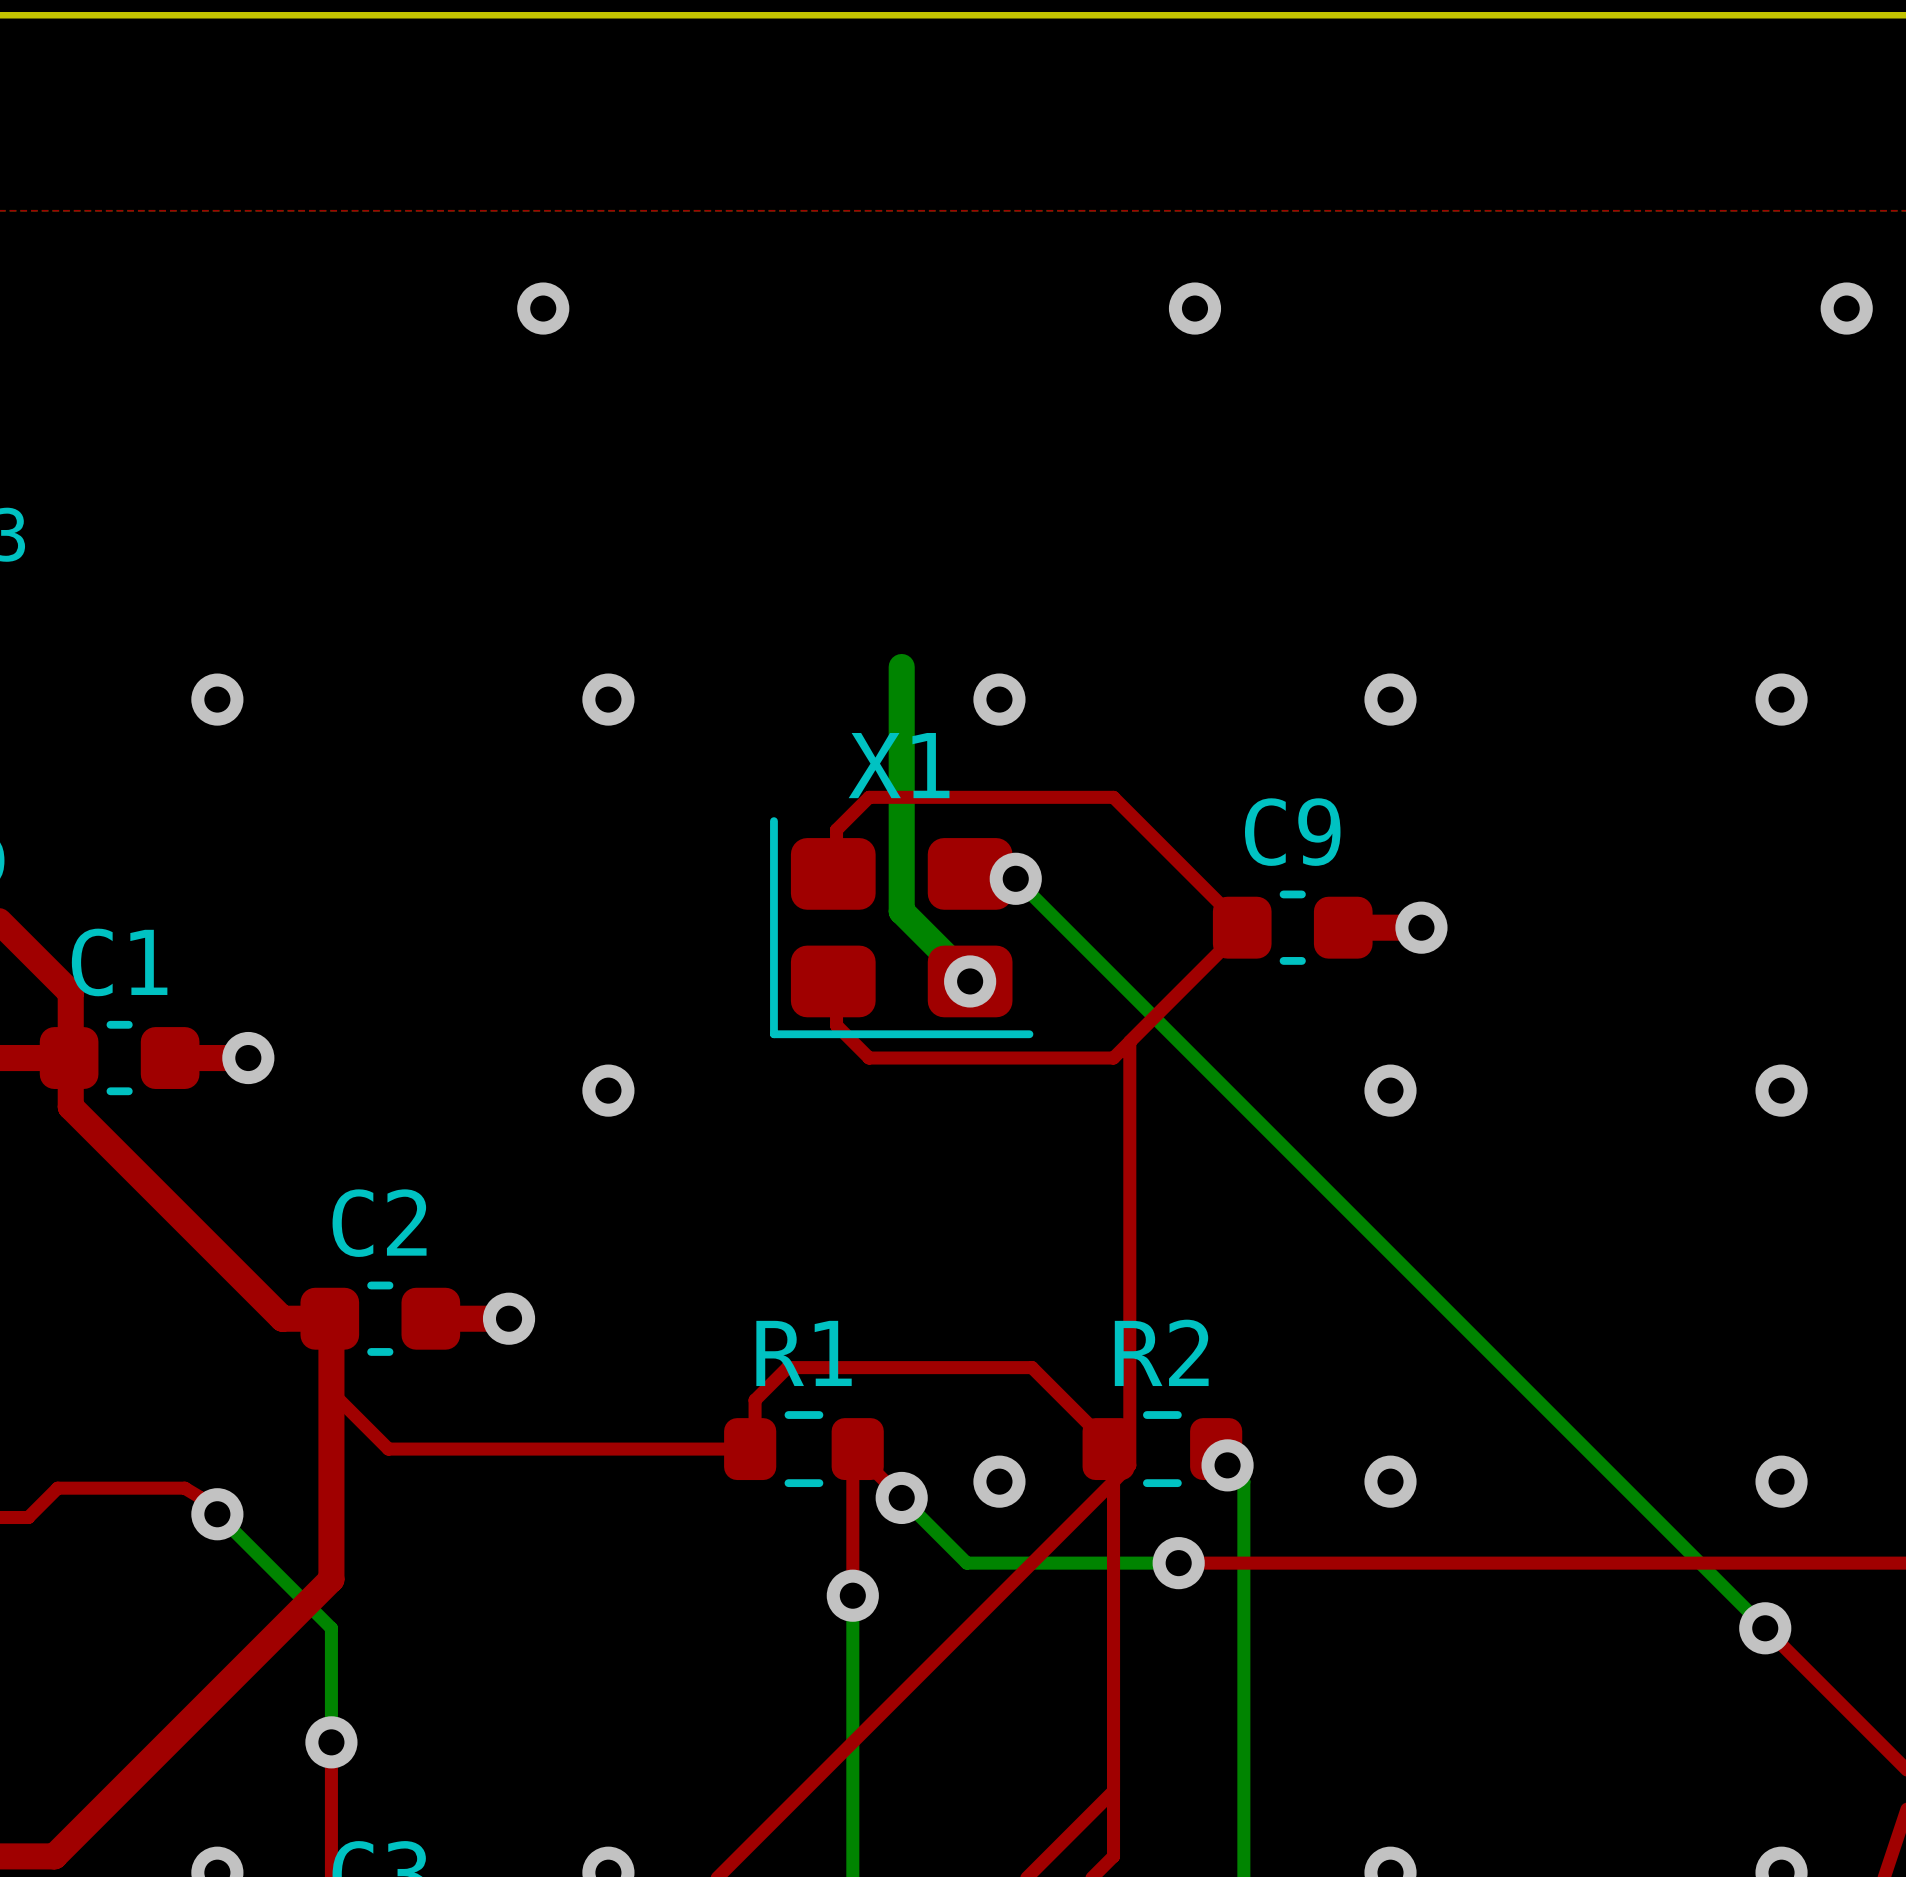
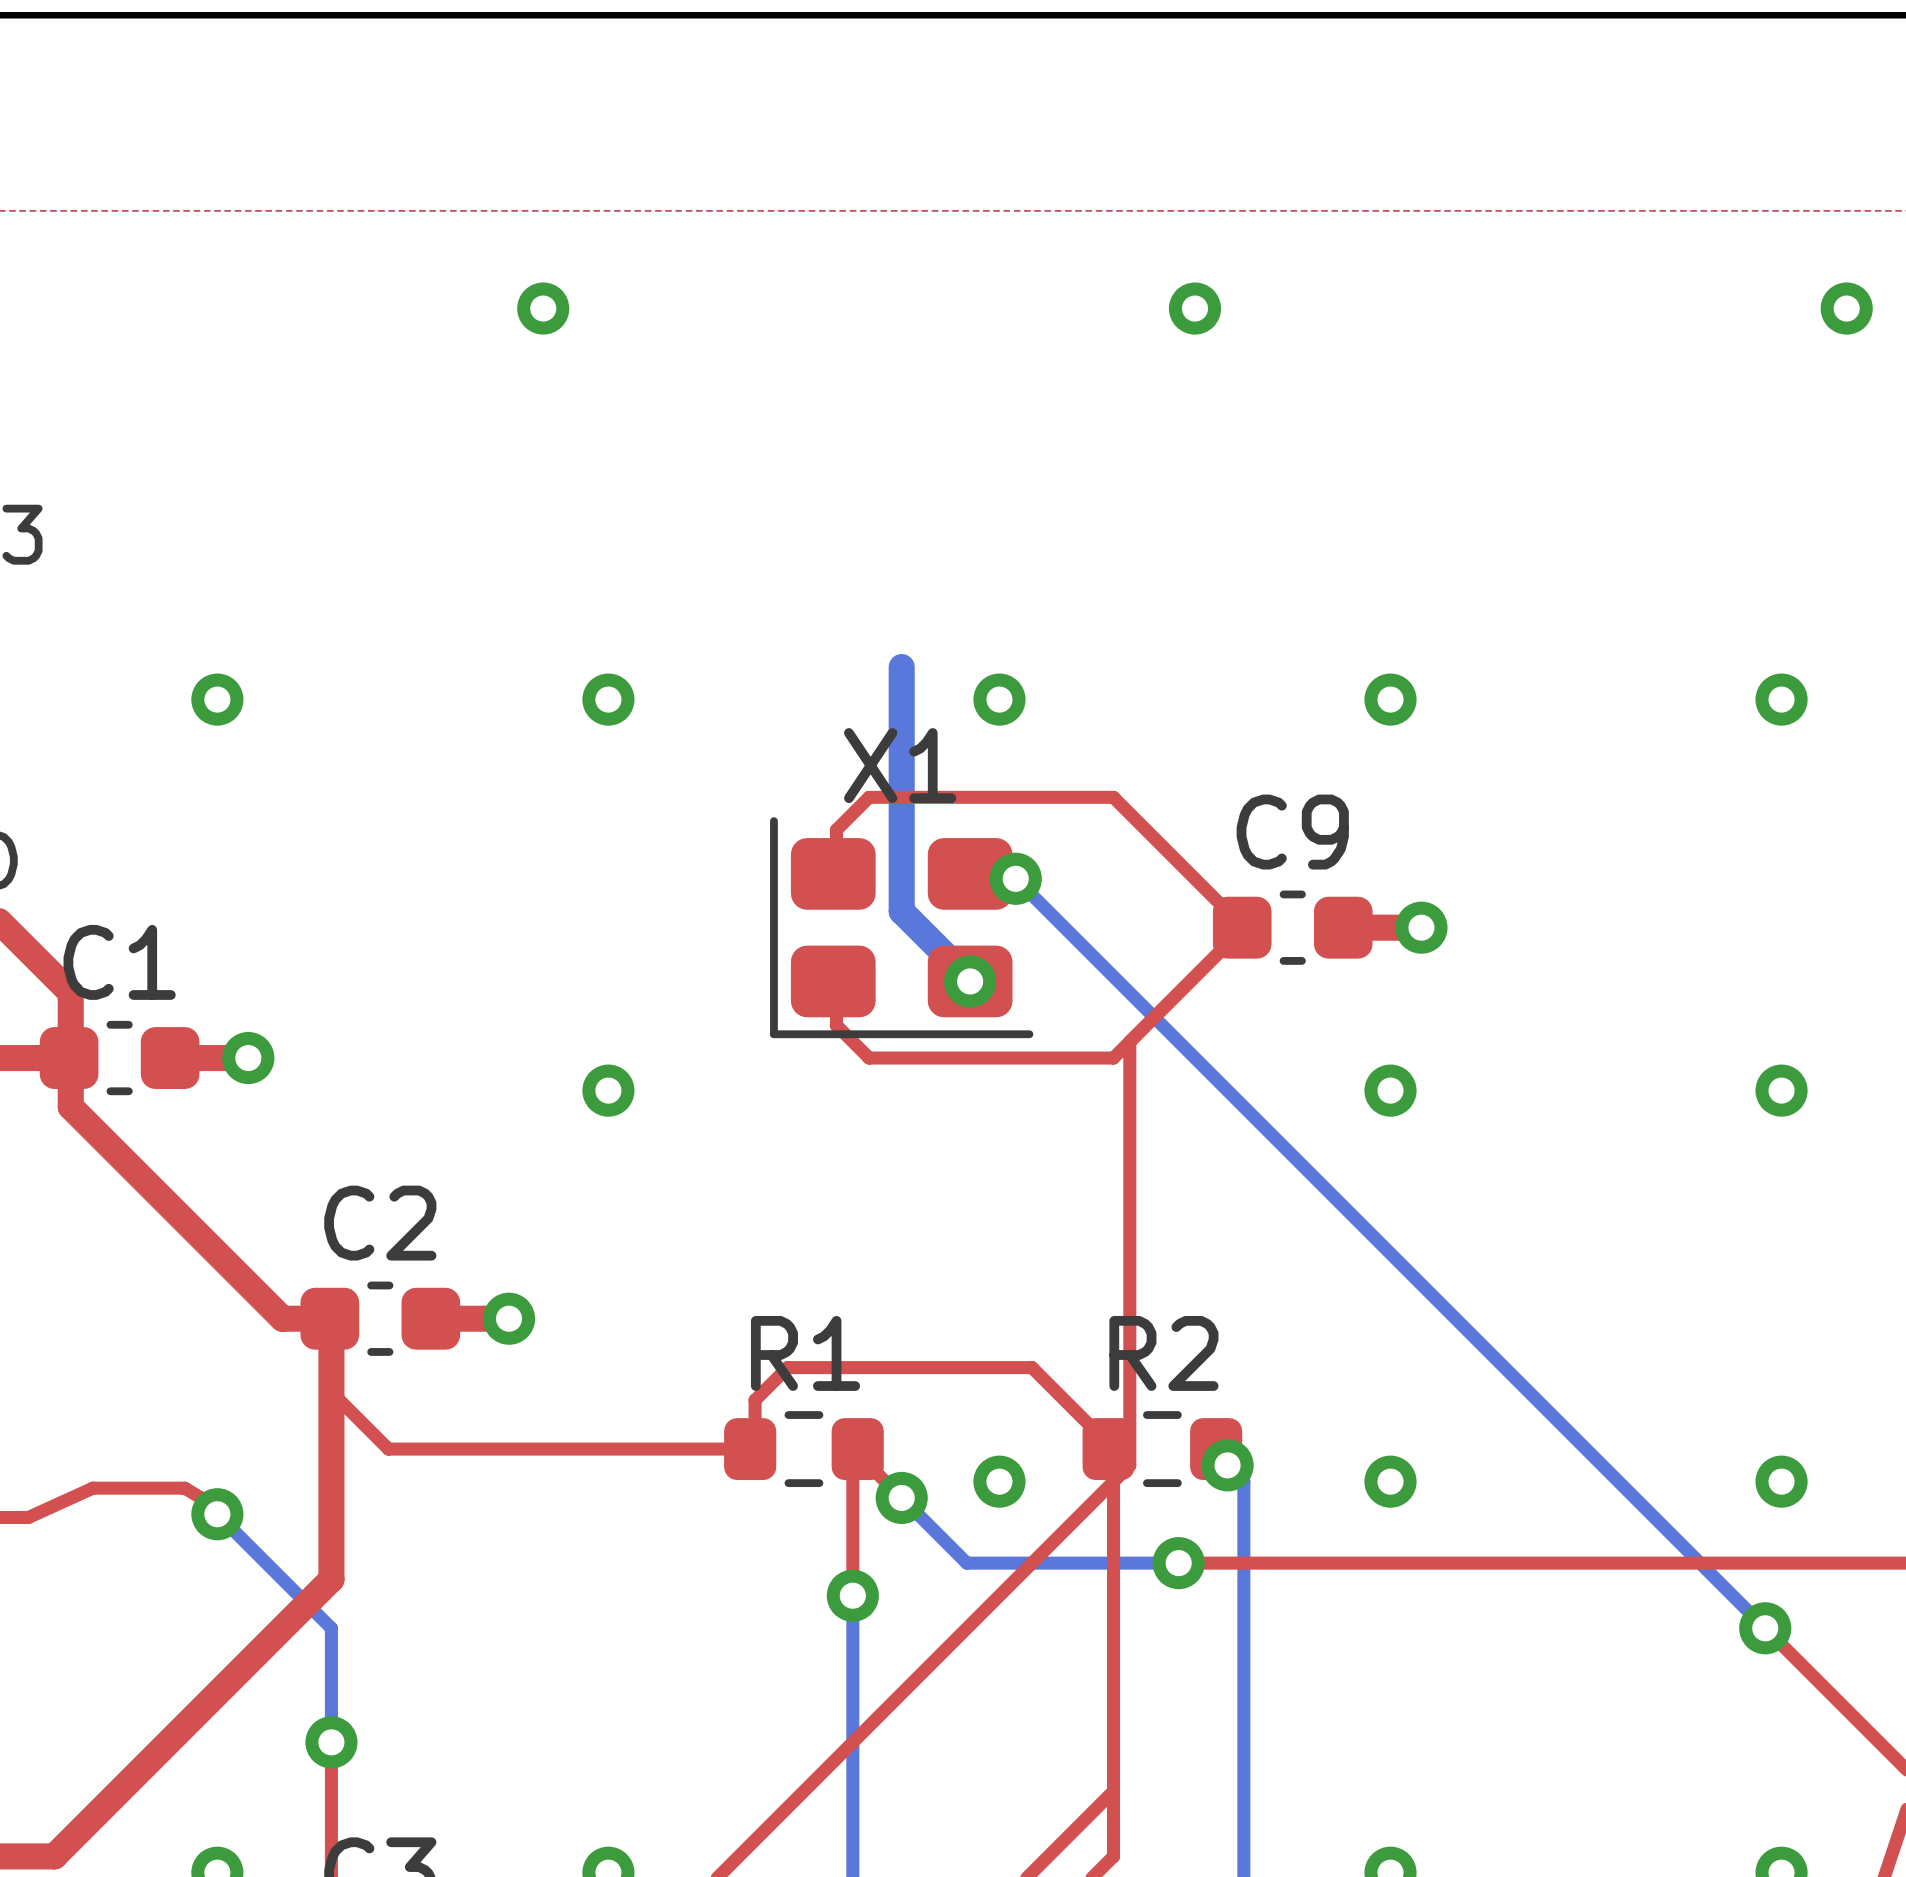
top track: (92, 1488) (57, 1488) (28, 1517) -> (92, 1488) (28, 1517)

